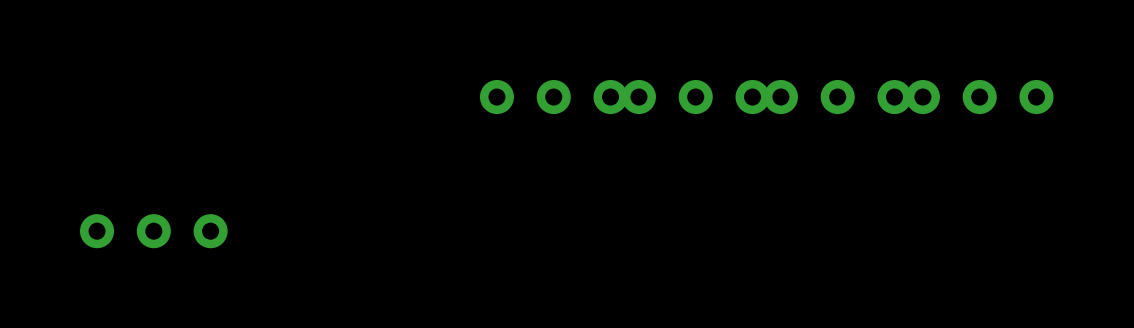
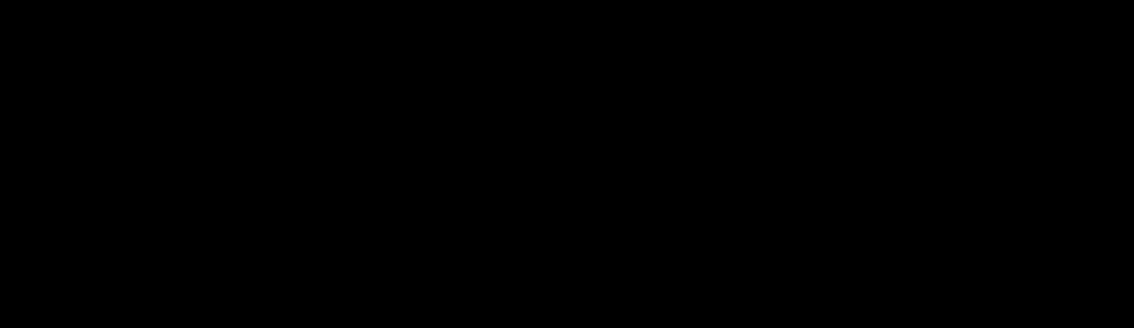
part: (553, 97) -> none
part: (695, 97) -> none
part: (837, 97) -> none
part: (979, 97) -> none
part: (153, 231) -> none

